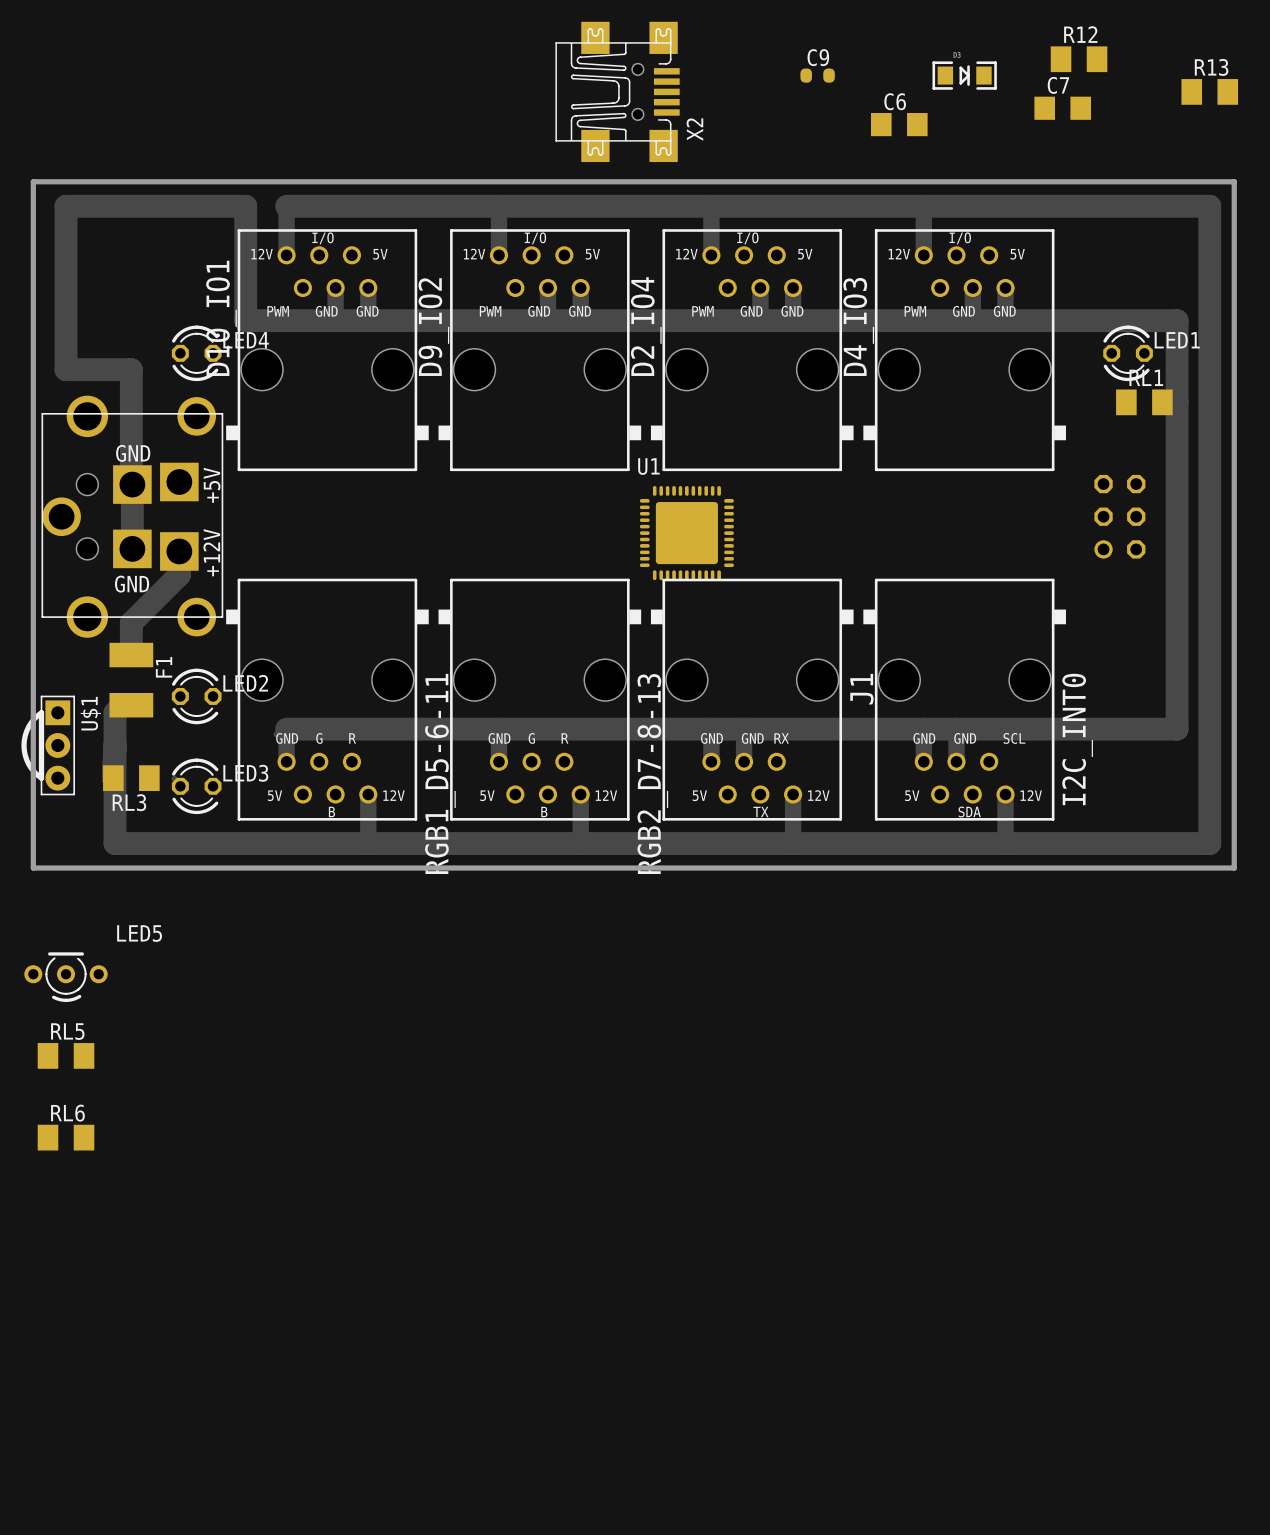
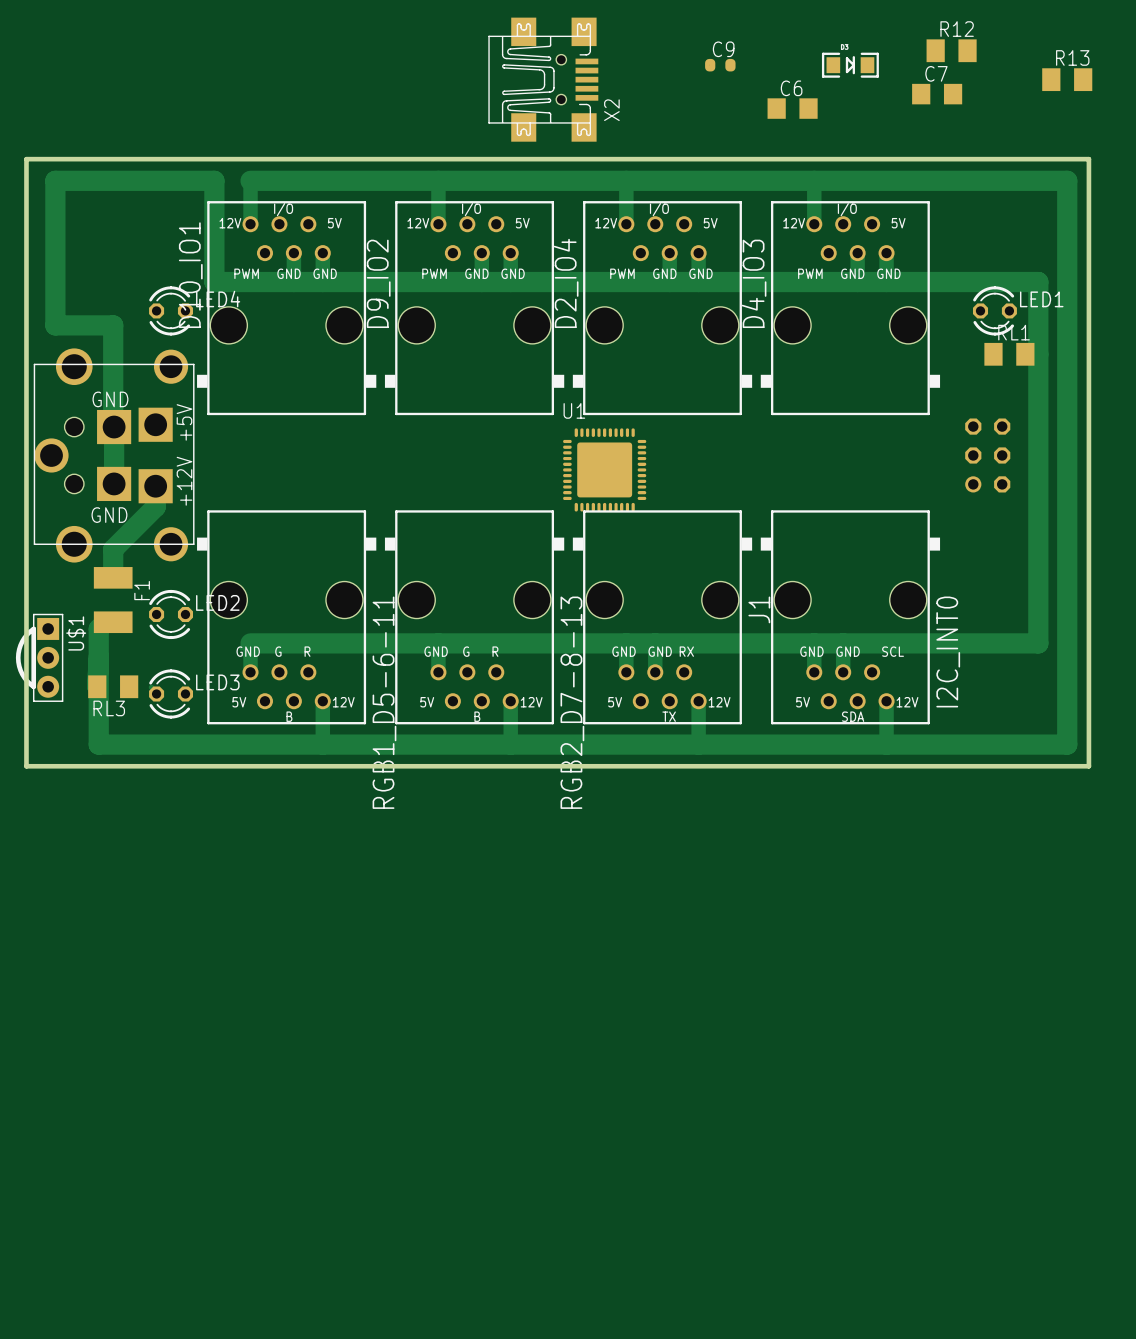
LED5: (66, 977) -> none
RL5: (66, 1055) -> none
RL6: (66, 1137) -> none

